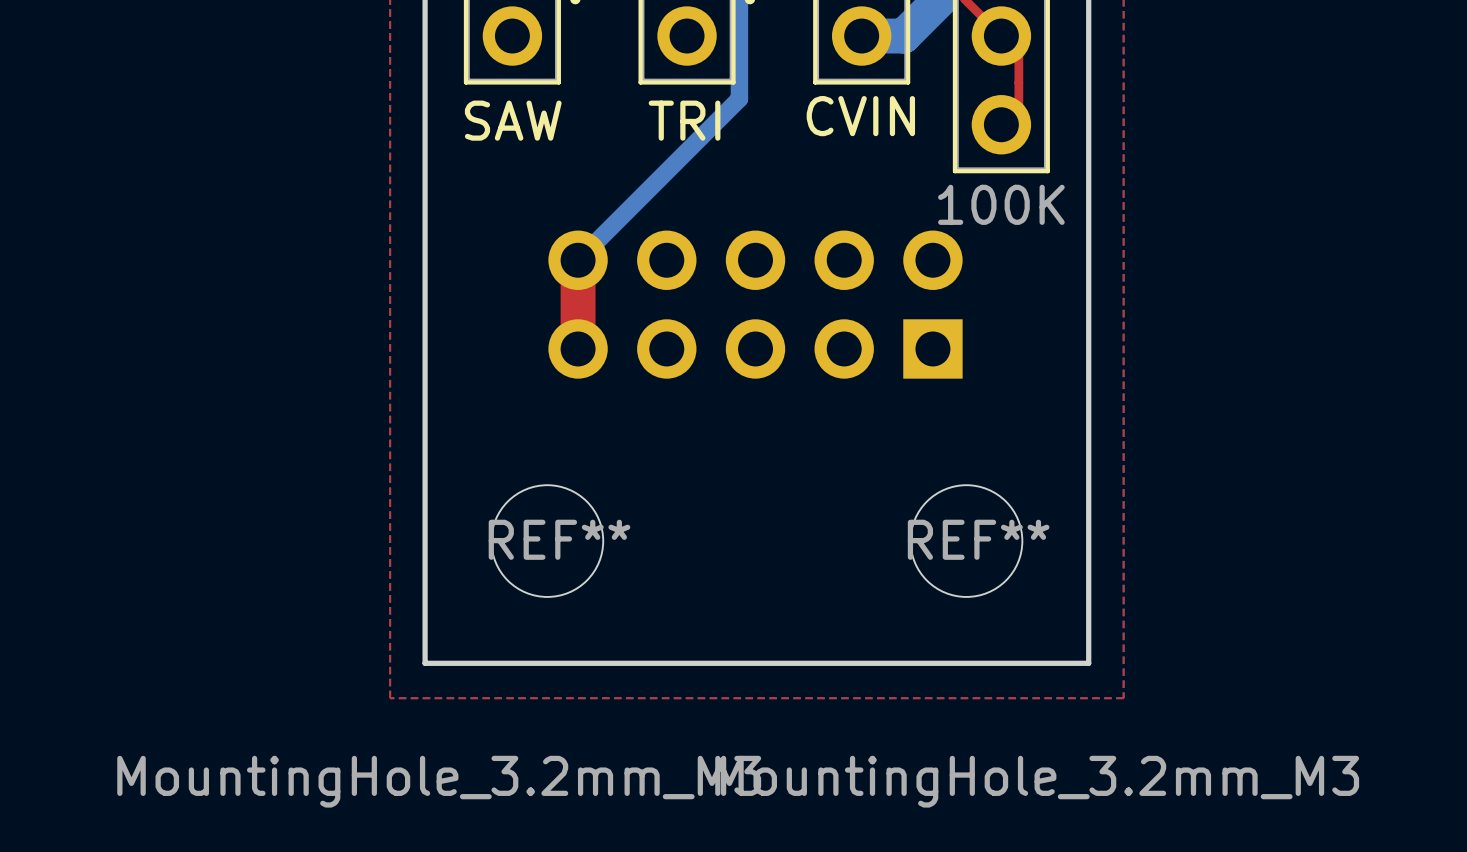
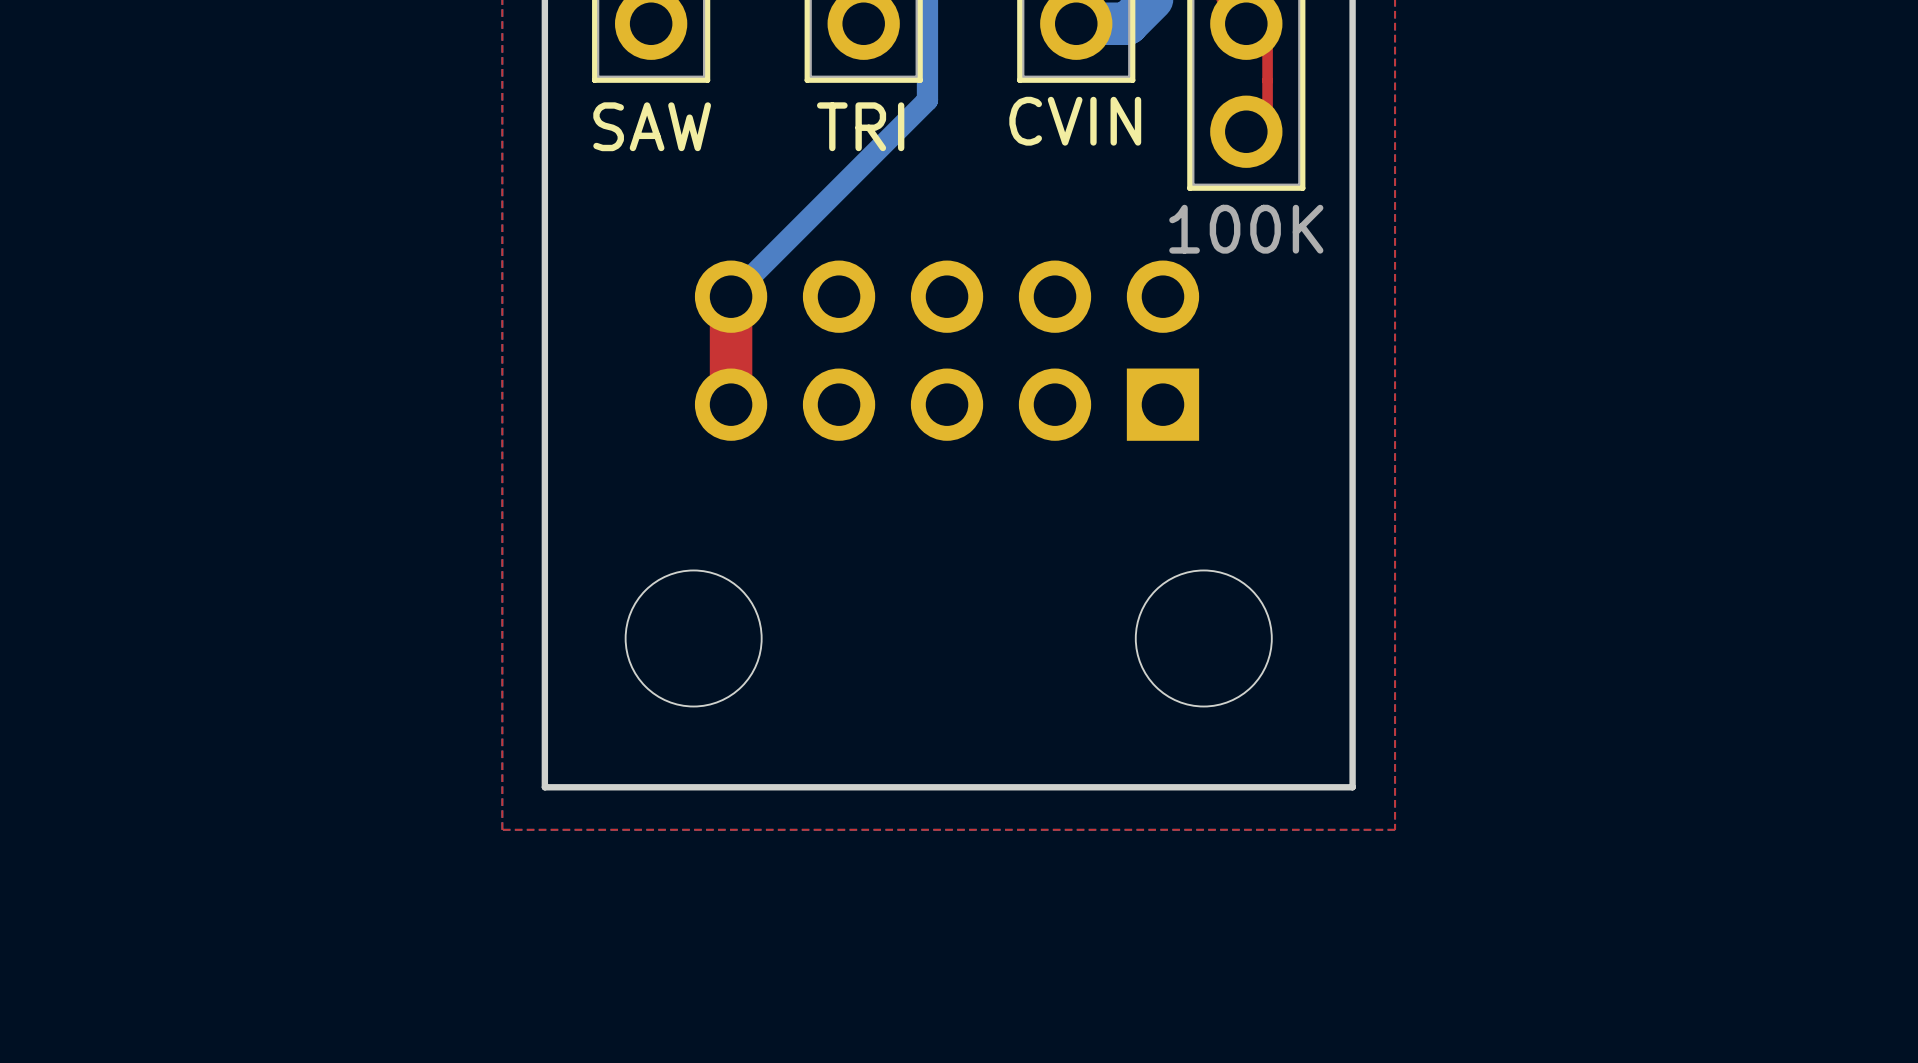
REF** name: REF** (559, 539) -> none
REF** name: REF** (978, 539) -> none
REF** value: MountingHole_3.2mm_M3 (439, 781) -> none
REF** value: MountingHole_3.2mm_M3 (1037, 781) -> none

